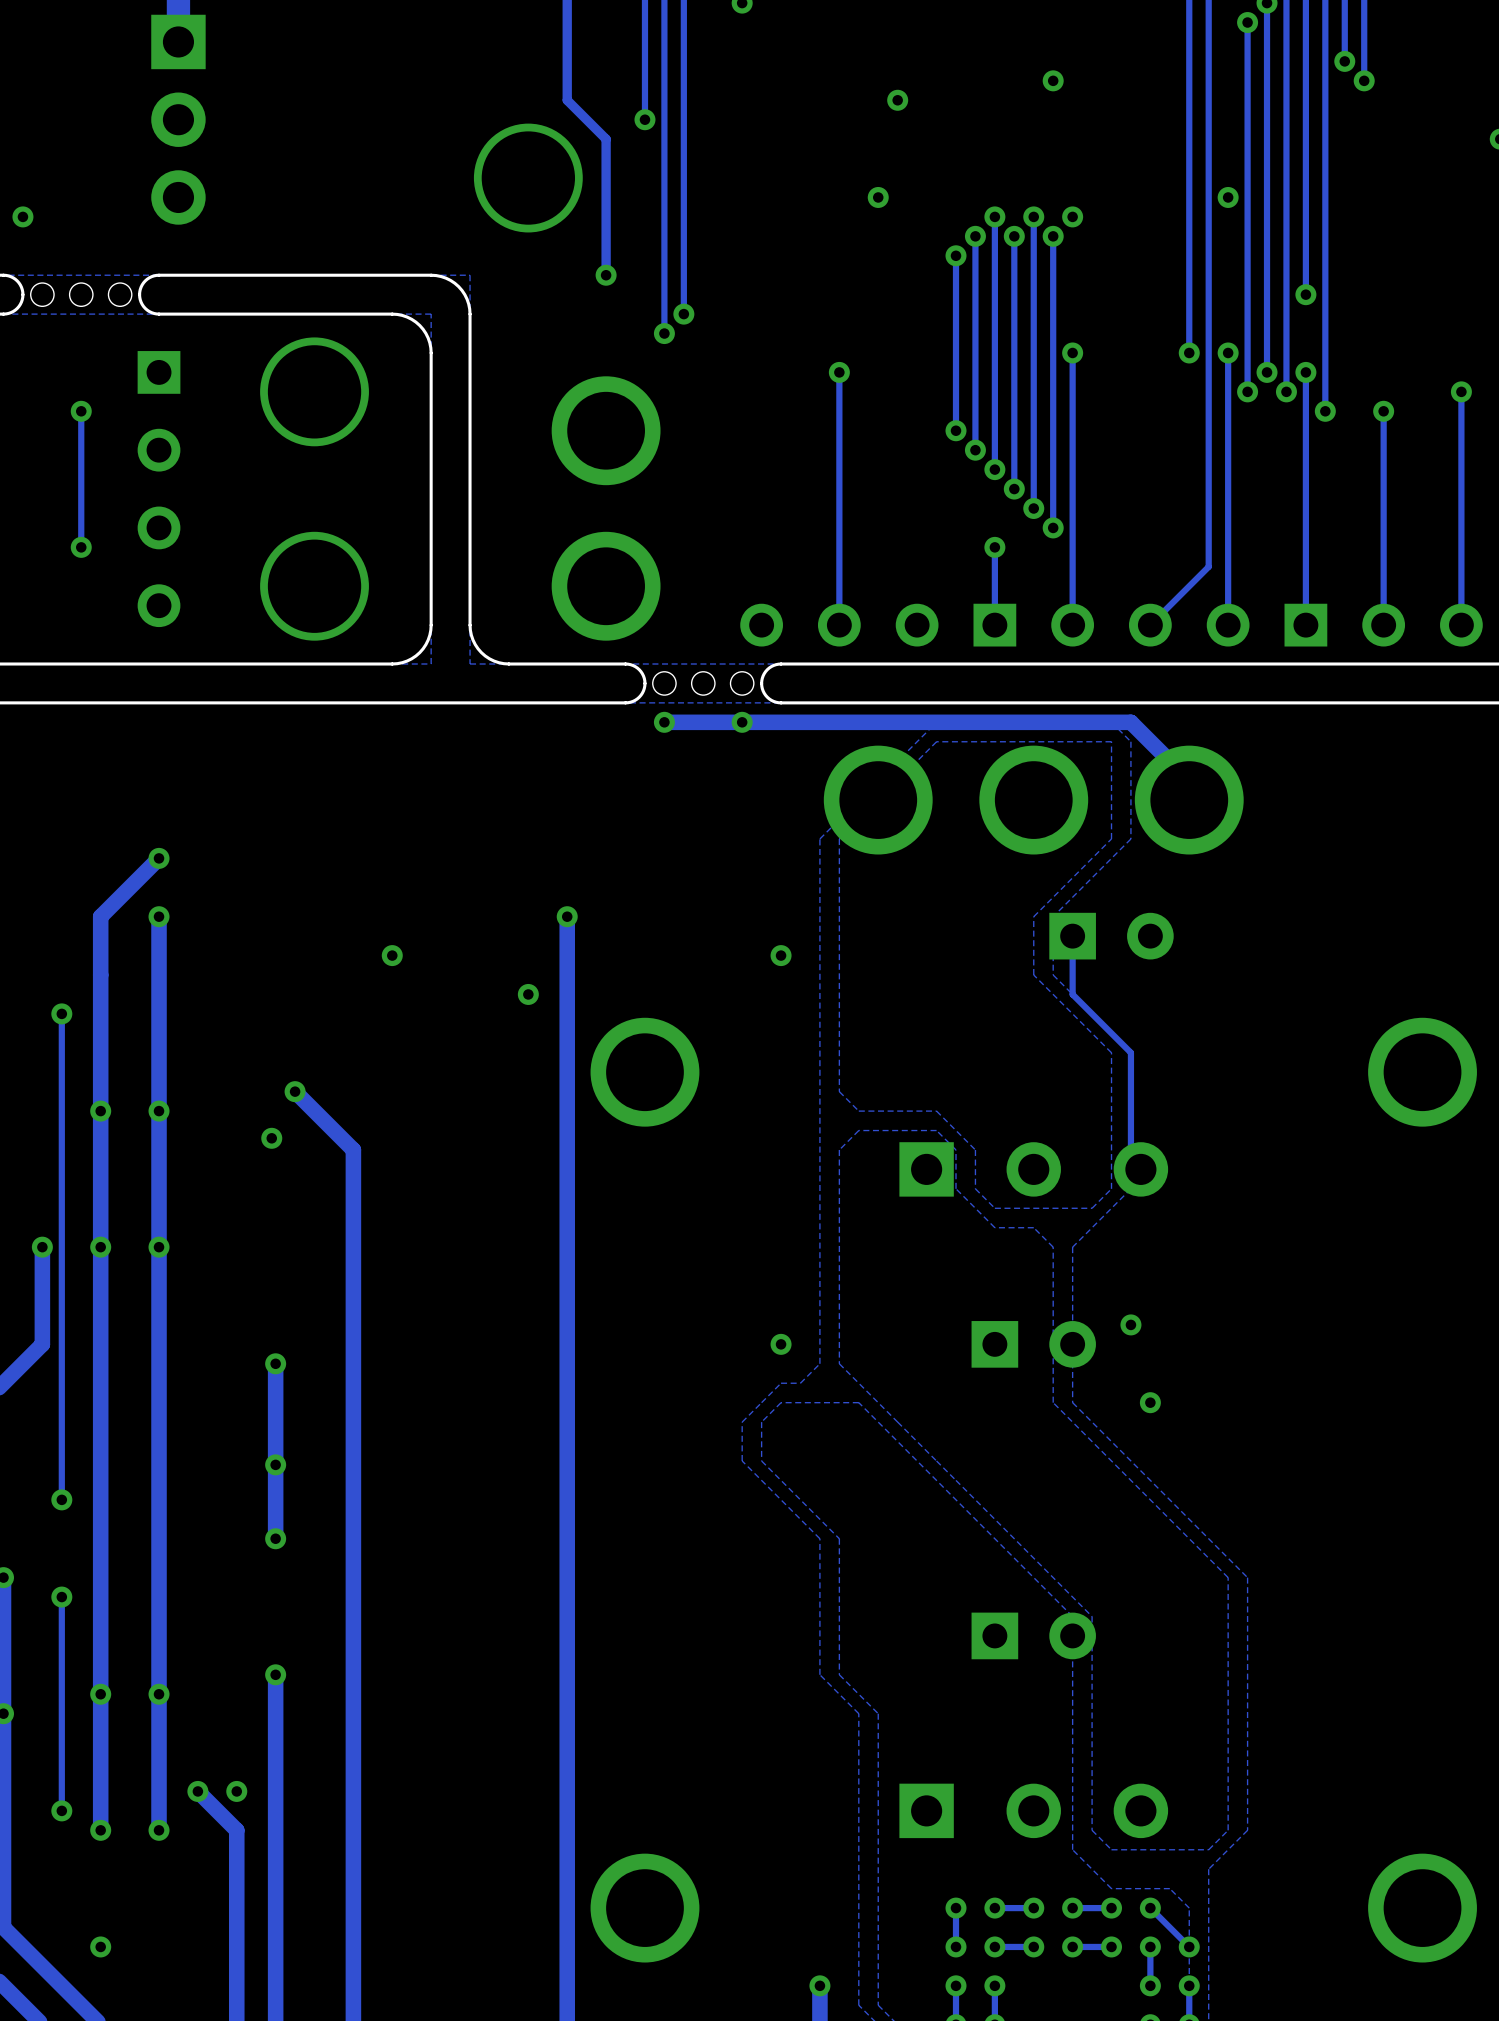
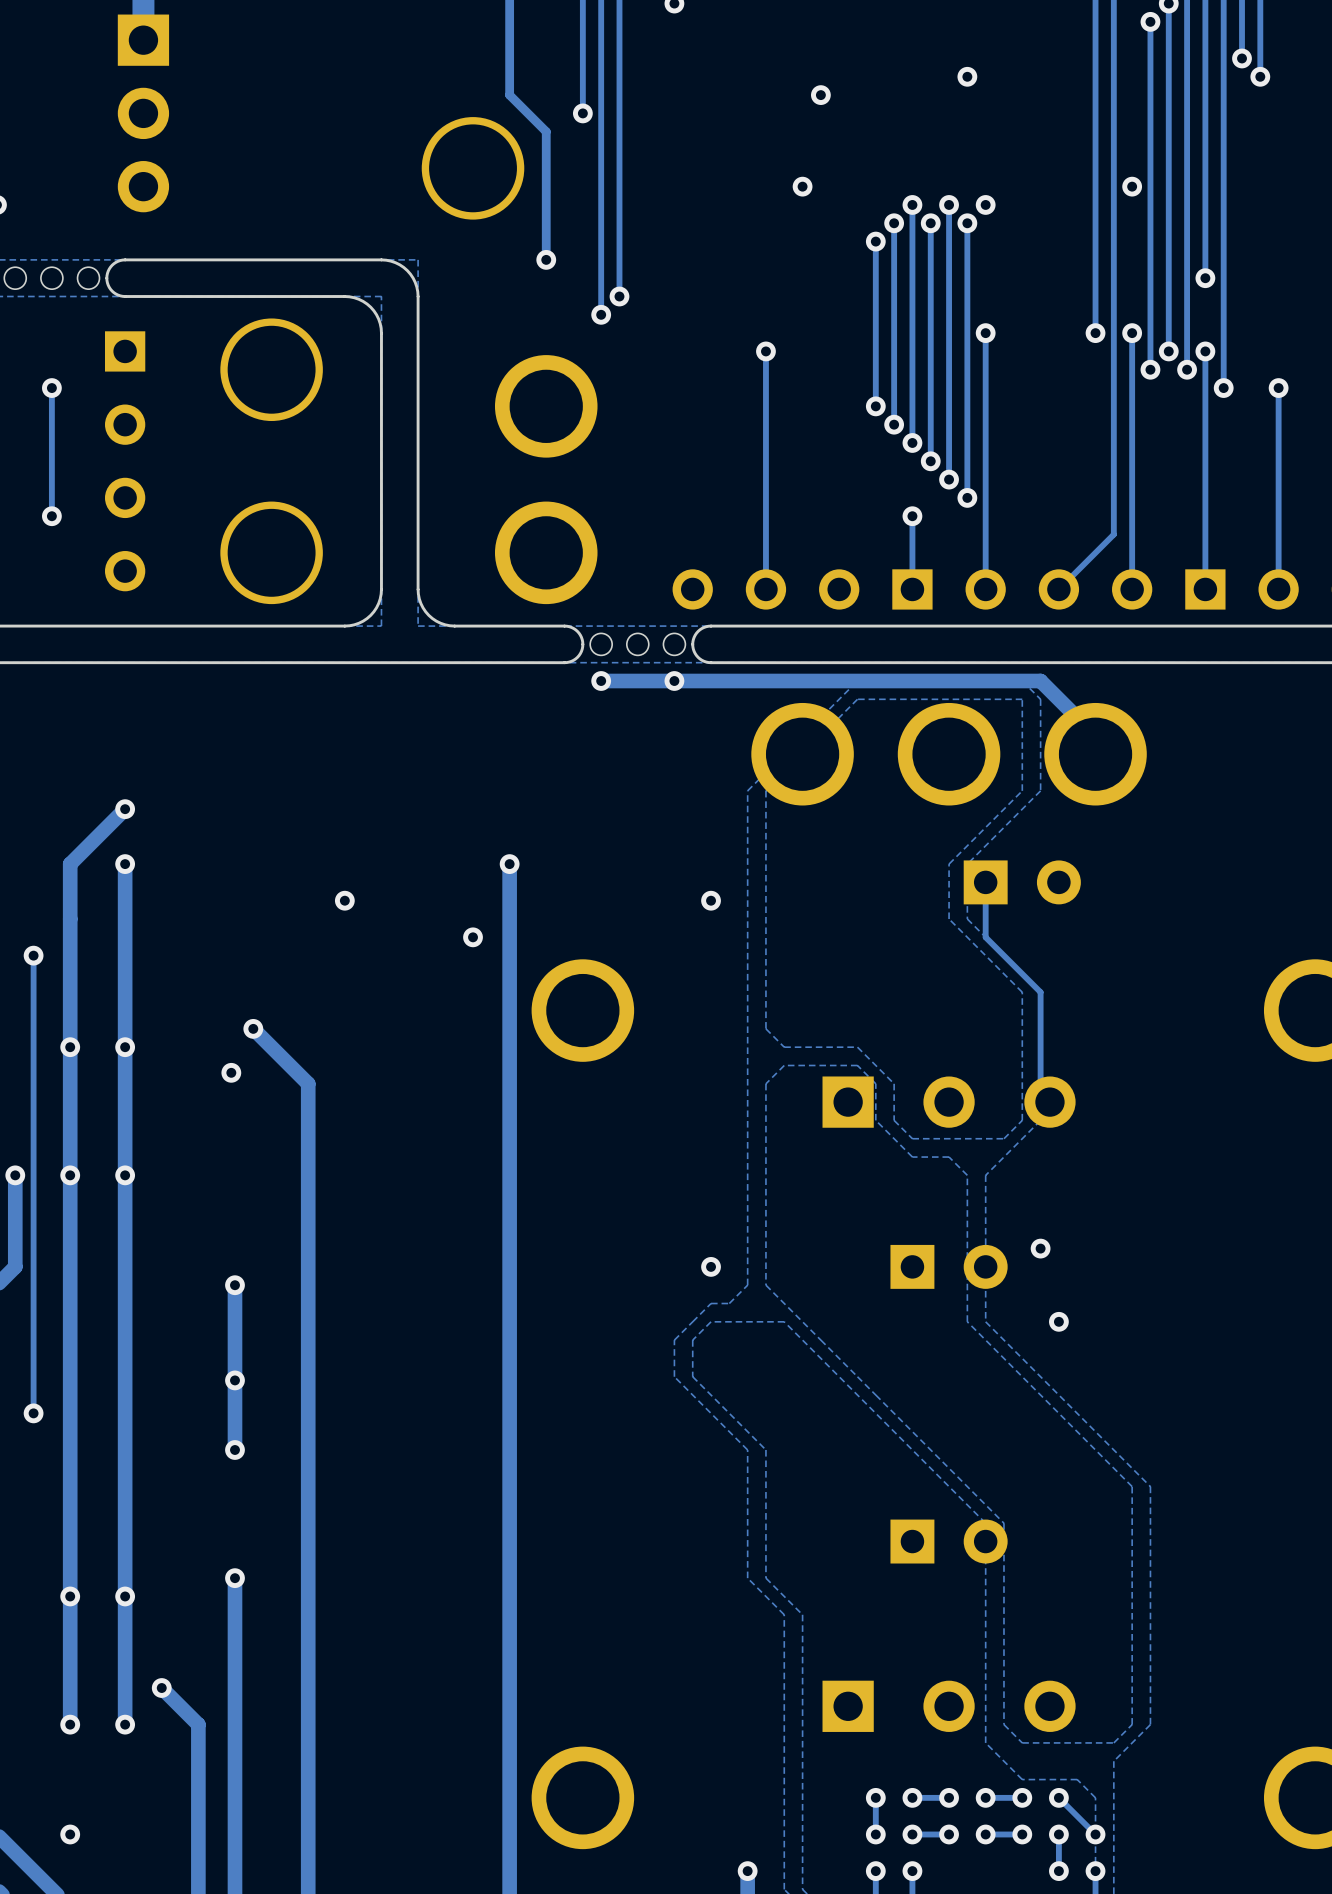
track: (61, 1597) (61, 1810) -> none
via: (61, 1597) -> none
via: (236, 1791) -> none
via: (61, 1810) -> none

